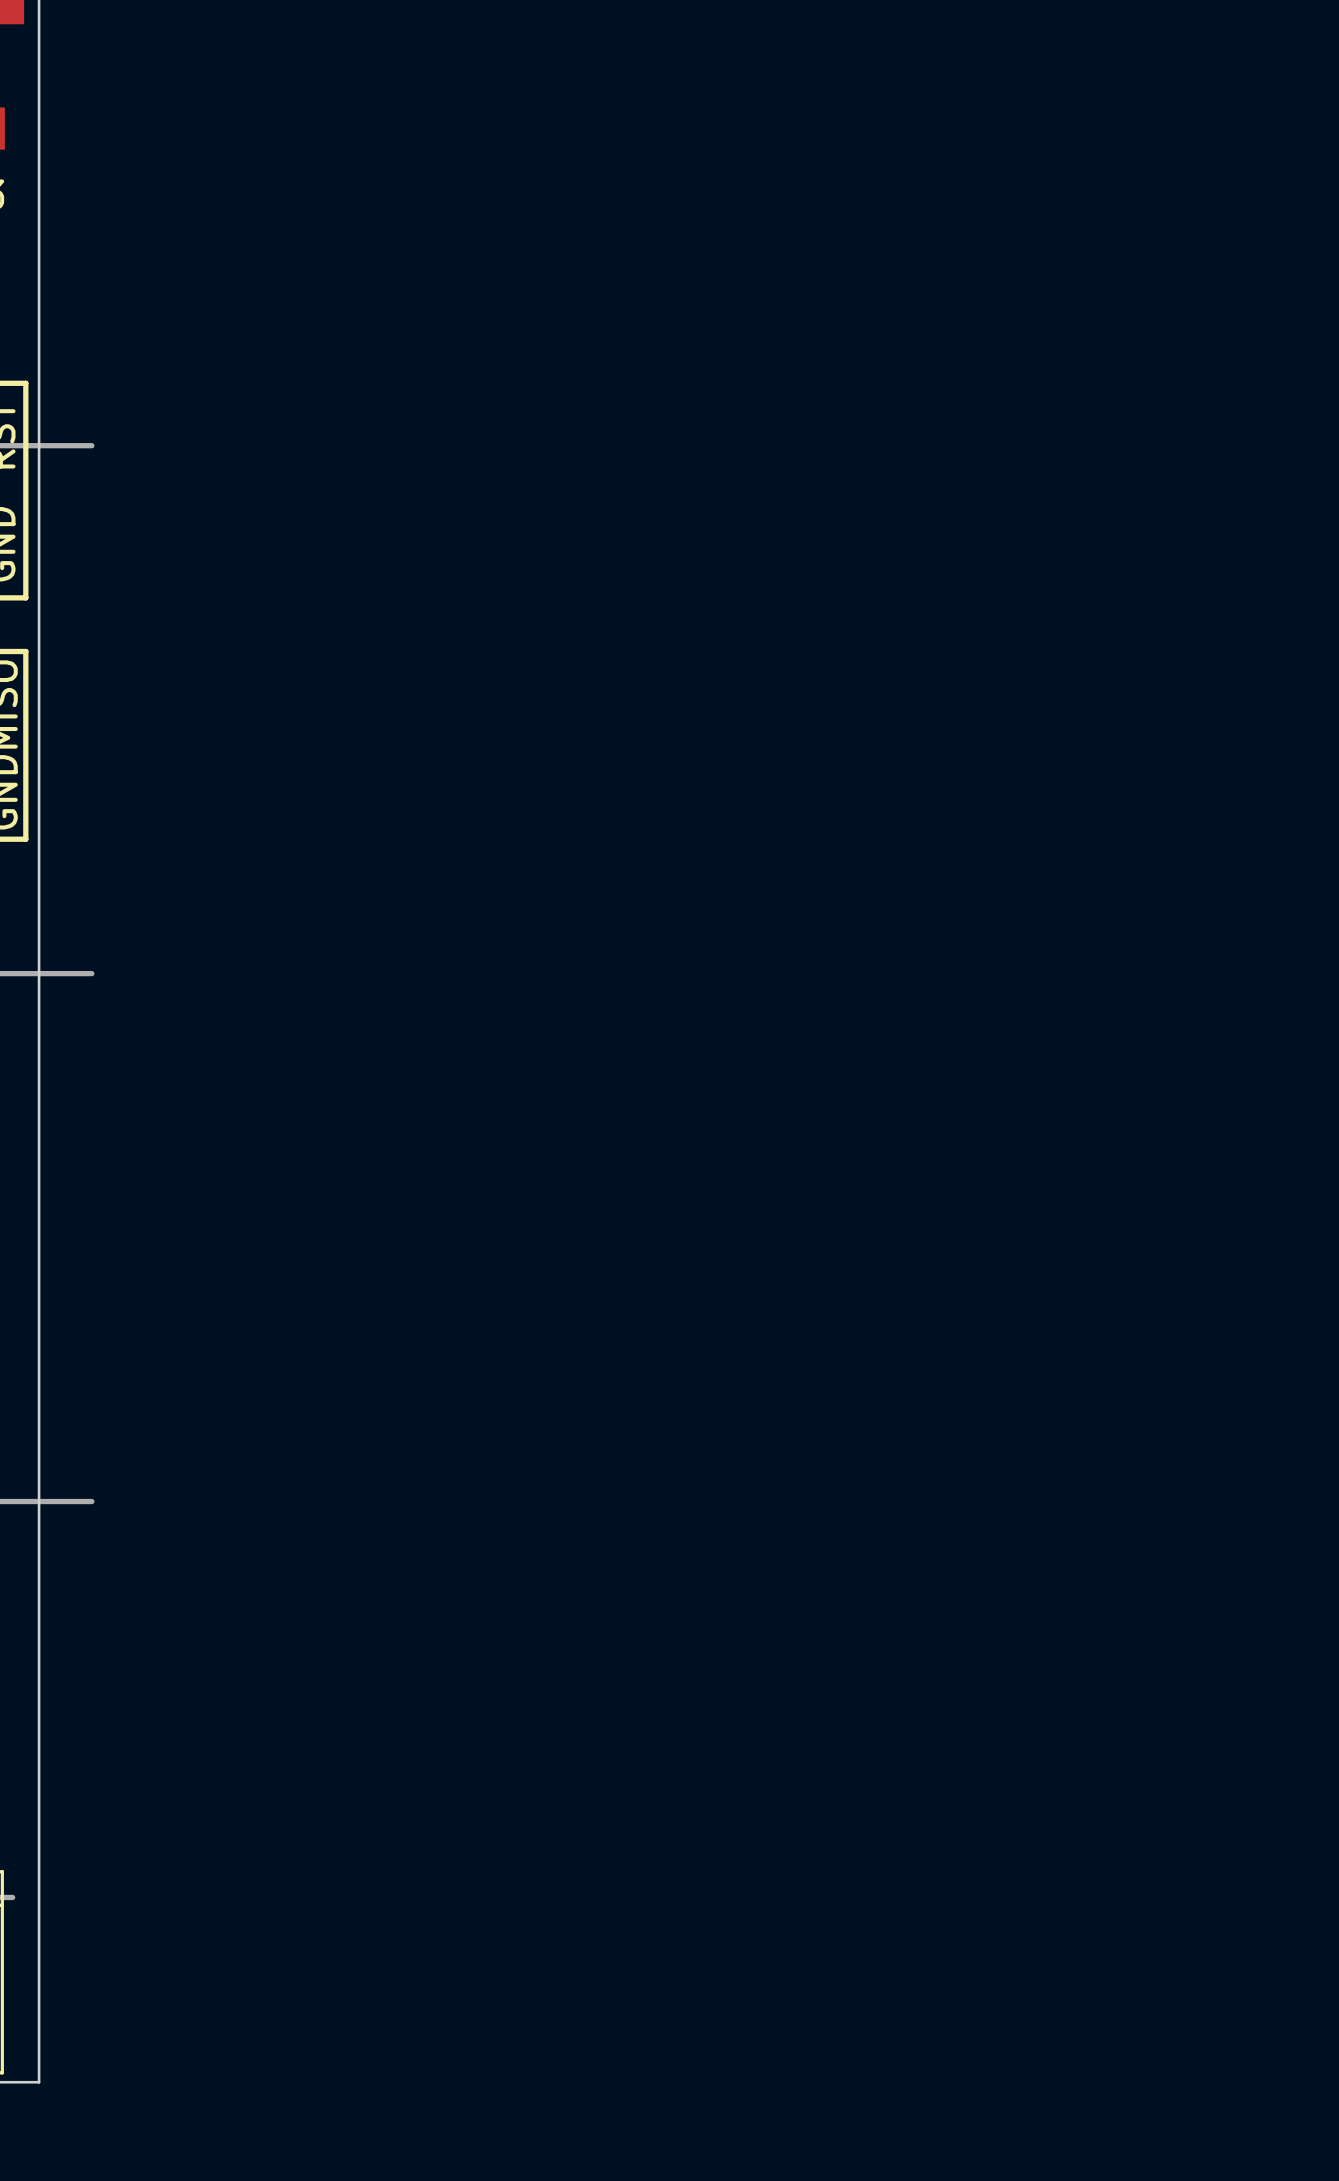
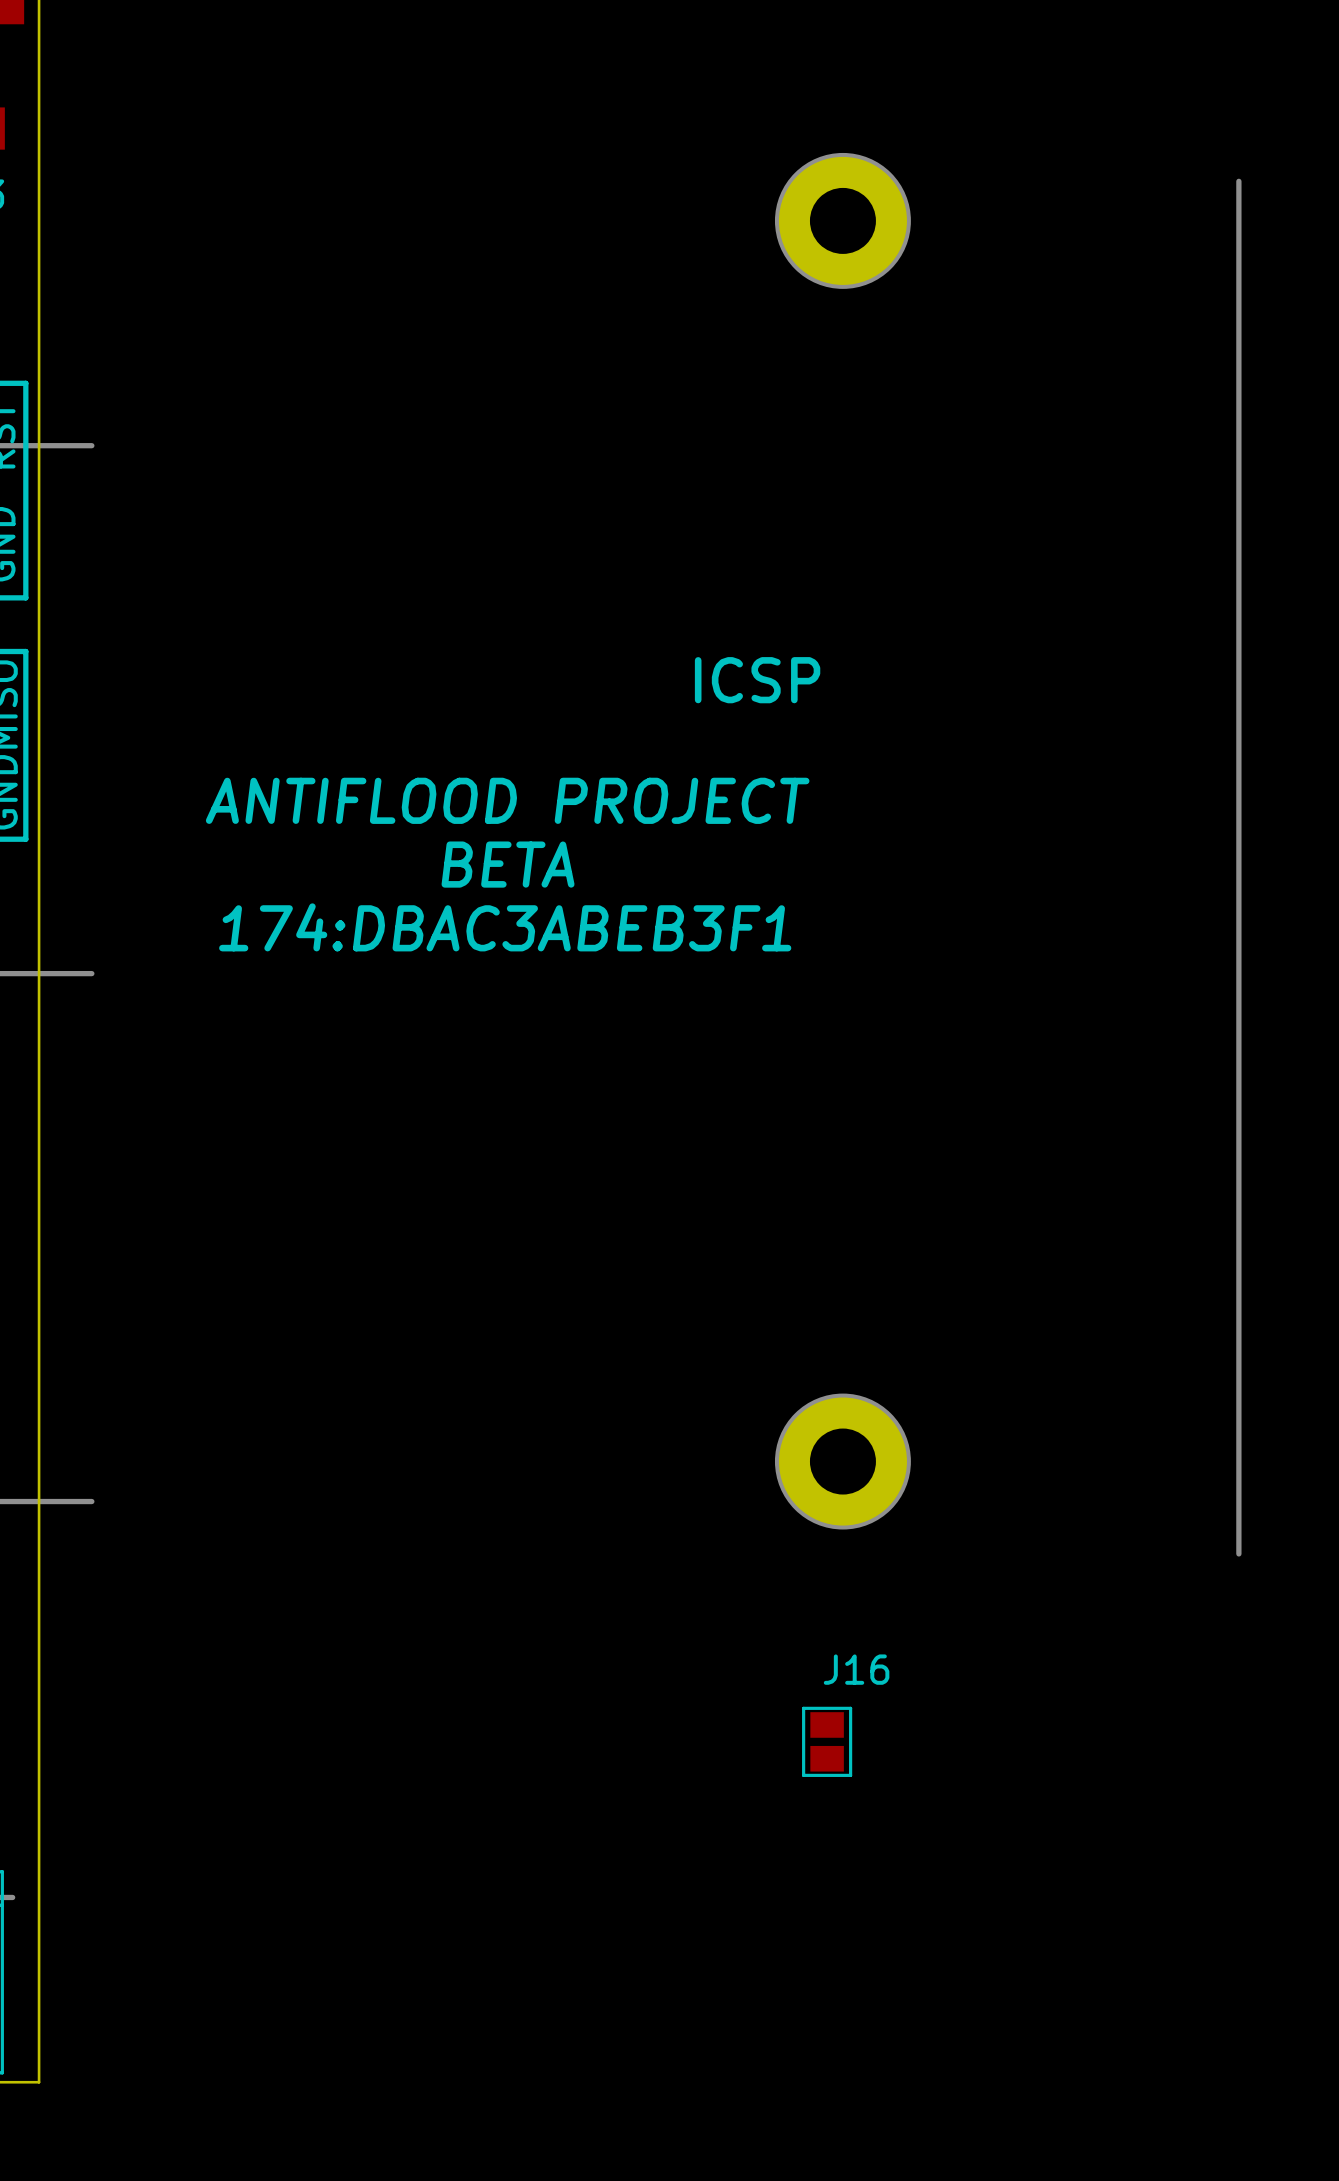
line: none -> (1238, 181) (1238, 1553)
part: none -> (842, 220)
text: none -> ICSP (757, 680)
text: none -> ANTIFLOOD PROJECT (507, 800)
text: none -> BETA (508, 864)
text: none -> 174:DBAC3ABEB3F1 (505, 927)
part: none -> (842, 1461)
J16: none -> (827, 1741)

